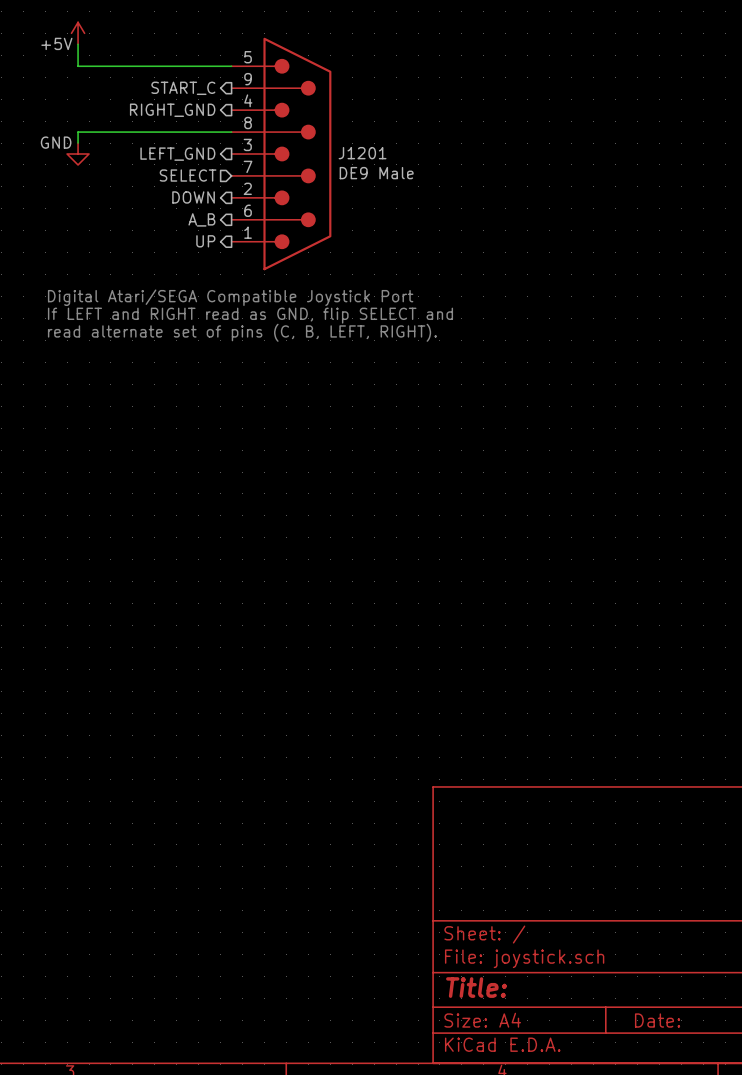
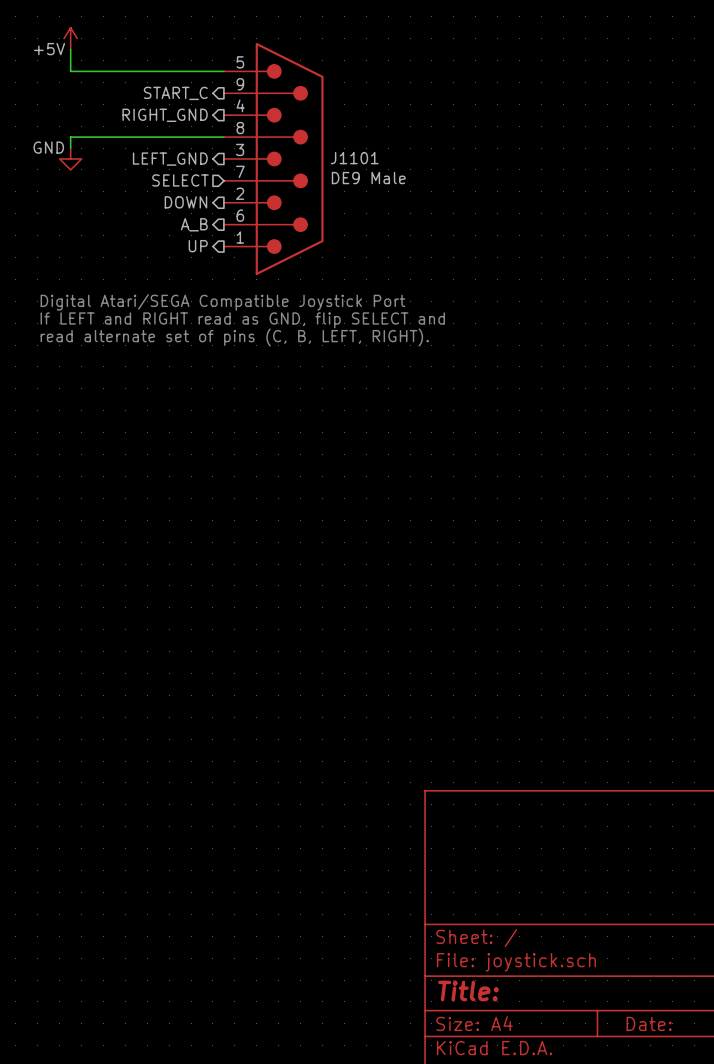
J1201 name: J1201 (362, 153) -> J1101 (354, 158)

